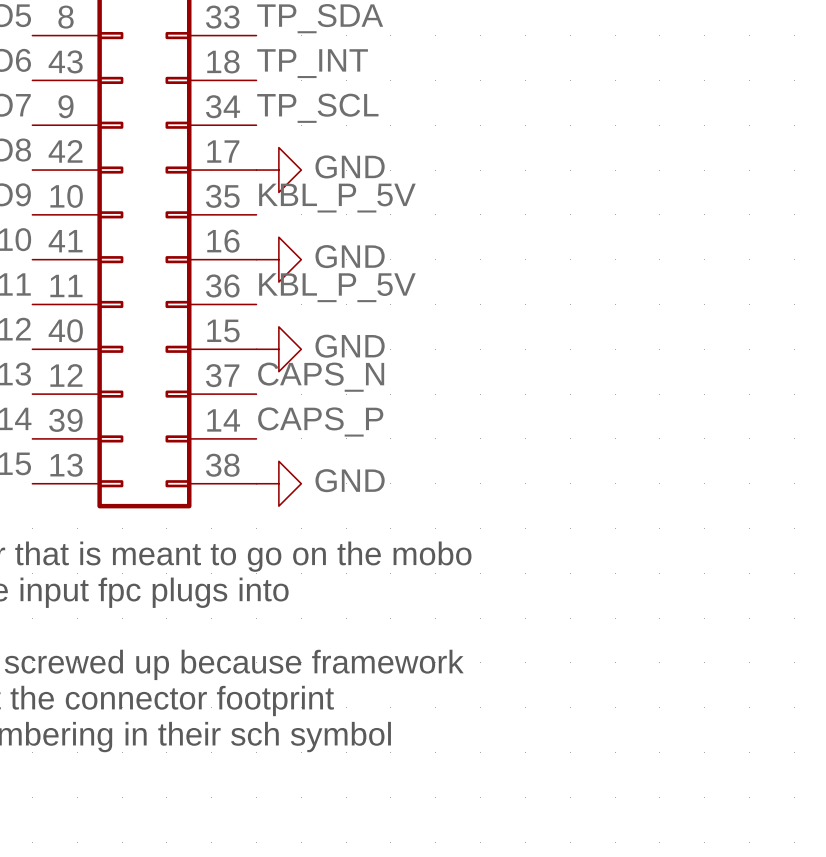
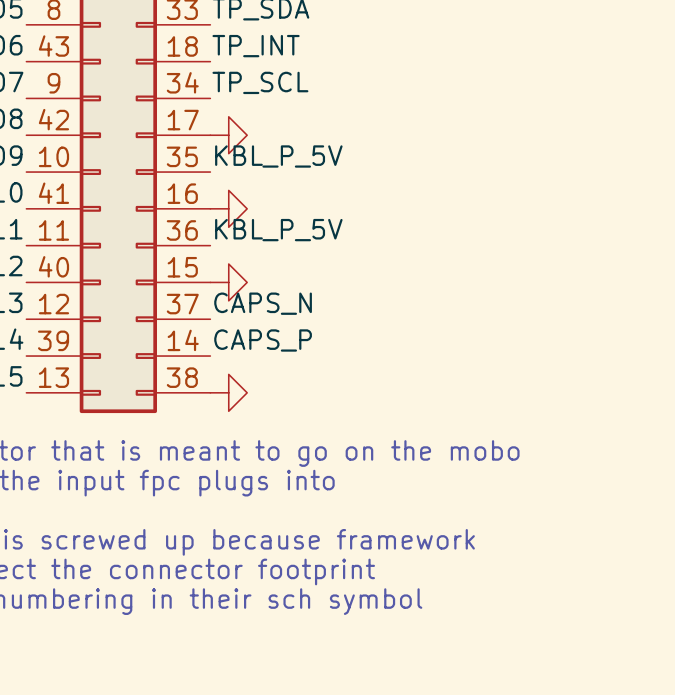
power symbol text: GND (350, 166) -> none
power symbol text: GND (350, 256) -> none
power symbol text: GND (350, 346) -> none
power symbol text: GND (350, 480) -> none

